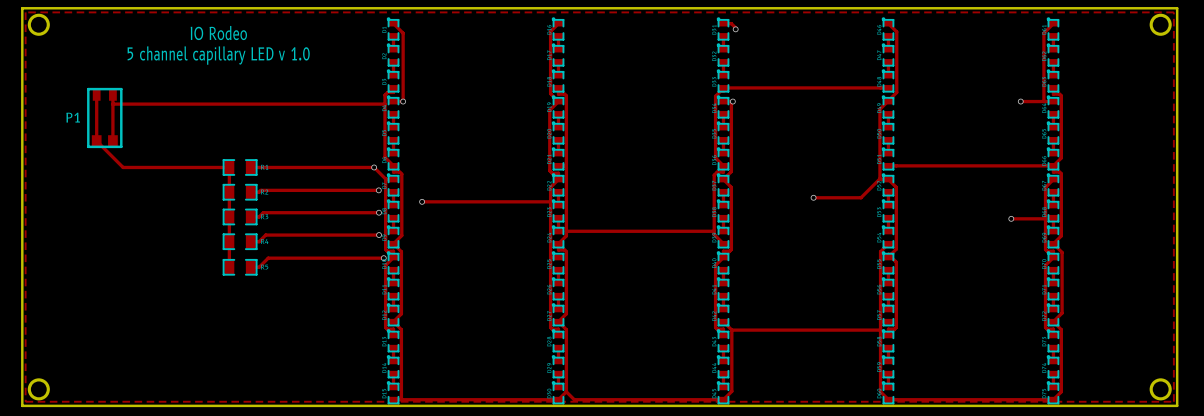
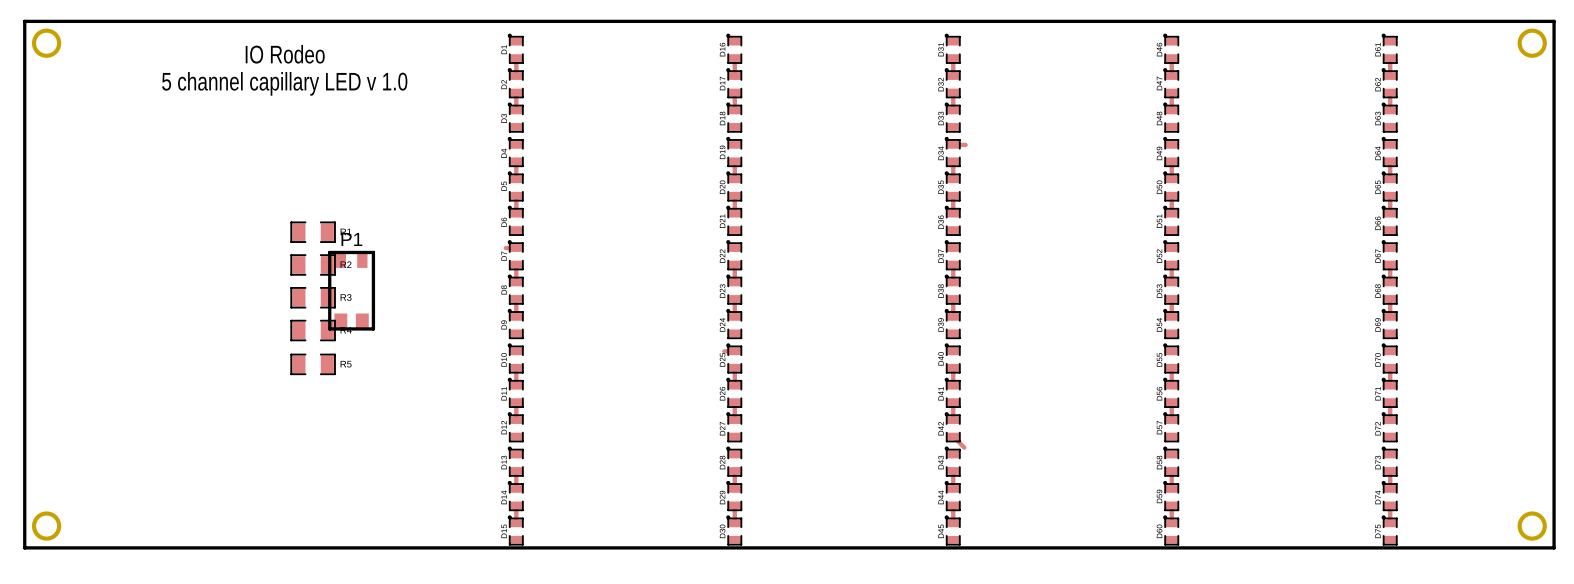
zone outline: (25, 12) (1173, 12) (1173, 401) (25, 401) (25, 12) -> none
track: (393, 23) (403, 33) (403, 101) (393, 101) -> none
track: (558, 23) (550, 31) (550, 93) (558, 101) (549, 110) (549, 170) (552, 173) (558, 173) (558, 179) (550, 187) (550, 327) (558, 329) (558, 335) -> none
track: (723, 23) (731, 23) (735, 29) -> none
track: (888, 23) (896, 31) (896, 92) (888, 100) -> none
track: (1053, 23) (1043, 33) (1043, 101) -> none
via: (735, 29) -> none
track: (393, 87) (393, 92) (387, 92) (384, 95) (384, 157) (393, 165) (393, 172) (401, 174) (401, 235) (393, 243) (401, 251) (401, 313) (393, 321) (401, 329) (401, 399) -> none
track: (558, 87) (558, 94) (566, 95) (565, 165) -> none
track: (888, 87) (726, 87) (723, 91) -> none
track: (1053, 87) (1053, 94) (1061, 95) (1061, 157) (1053, 165) -> none
track: (723, 91) (715, 96) (715, 157) (723, 165) (723, 172) (717, 172) (714, 175) (714, 234) (723, 243) -> none
track: (96, 94) (96, 141) (123, 167) (229, 167) (229, 267) -> none
track: (112, 94) (112, 141) -> none
track: (888, 100) (879, 109) (879, 178) -> none
via: (403, 101) -> none
track: (731, 101) (731, 171) (723, 179) (731, 187) (731, 249) (723, 251) (723, 257) (715, 265) (715, 327) (723, 329) (723, 335) -> none
via: (732, 101) -> none
track: (1020, 101) (1053, 101) -> none
via: (1020, 101) -> none
track: (112, 104) (384, 104) -> none
P1 name position: P1 (73, 117) -> P1 (351, 239)
P1 position: (104, 117) -> (351, 290)
track: (565, 165) (566, 235) (558, 243) (558, 250) (566, 251) (566, 313) (558, 321) (566, 329) (566, 391) -> none
track: (888, 165) (1053, 165) -> none
track: (1053, 165) (1053, 172) (1061, 173) (1061, 235) (1053, 243) (1062, 252) (1062, 313) (1053, 321) (1061, 329) (1061, 391) (1053, 399) (888, 399) (880, 391) (880, 321) -> none
track: (250, 167) (374, 167) (385, 178) (385, 249) (393, 251) (393, 257) (385, 265) (385, 327) (393, 329) (393, 335) -> none
via: (374, 167) -> none
track: (879, 178) (861, 197) (813, 197) -> none
track: (879, 178) (888, 179) (896, 187) (896, 249) (888, 254) -> none
track: (1053, 179) (1045, 187) (1045, 249) (1053, 251) (1053, 257) (1045, 265) (1045, 327) (1053, 329) (1053, 335) -> none
track: (378, 190) (260, 190) (250, 192) -> none
via: (378, 190) -> none
via: (813, 197) -> none
track: (422, 201) (550, 201) -> none
via: (422, 201) -> none
track: (379, 212) (263, 212) (259, 216) (250, 216) -> none
via: (379, 212) -> none
track: (1011, 218) (1045, 218) -> none
via: (1011, 218) -> none
track: (566, 231) (714, 231) -> none
track: (379, 235) (265, 235) (259, 241) (250, 241) -> none
via: (379, 235) -> none
track: (888, 243) (880, 251) (880, 321) (888, 321) -> none
track: (888, 254) (896, 262) (896, 327) (888, 329) (888, 335) -> none
track: (383, 258) (268, 258) (259, 267) (250, 267) -> none
via: (383, 258) -> none
track: (880, 330) (731, 330) (731, 391) (723, 399) (574, 399) (566, 391) -> none
track: (566, 391) (558, 399) (393, 399) -> none

